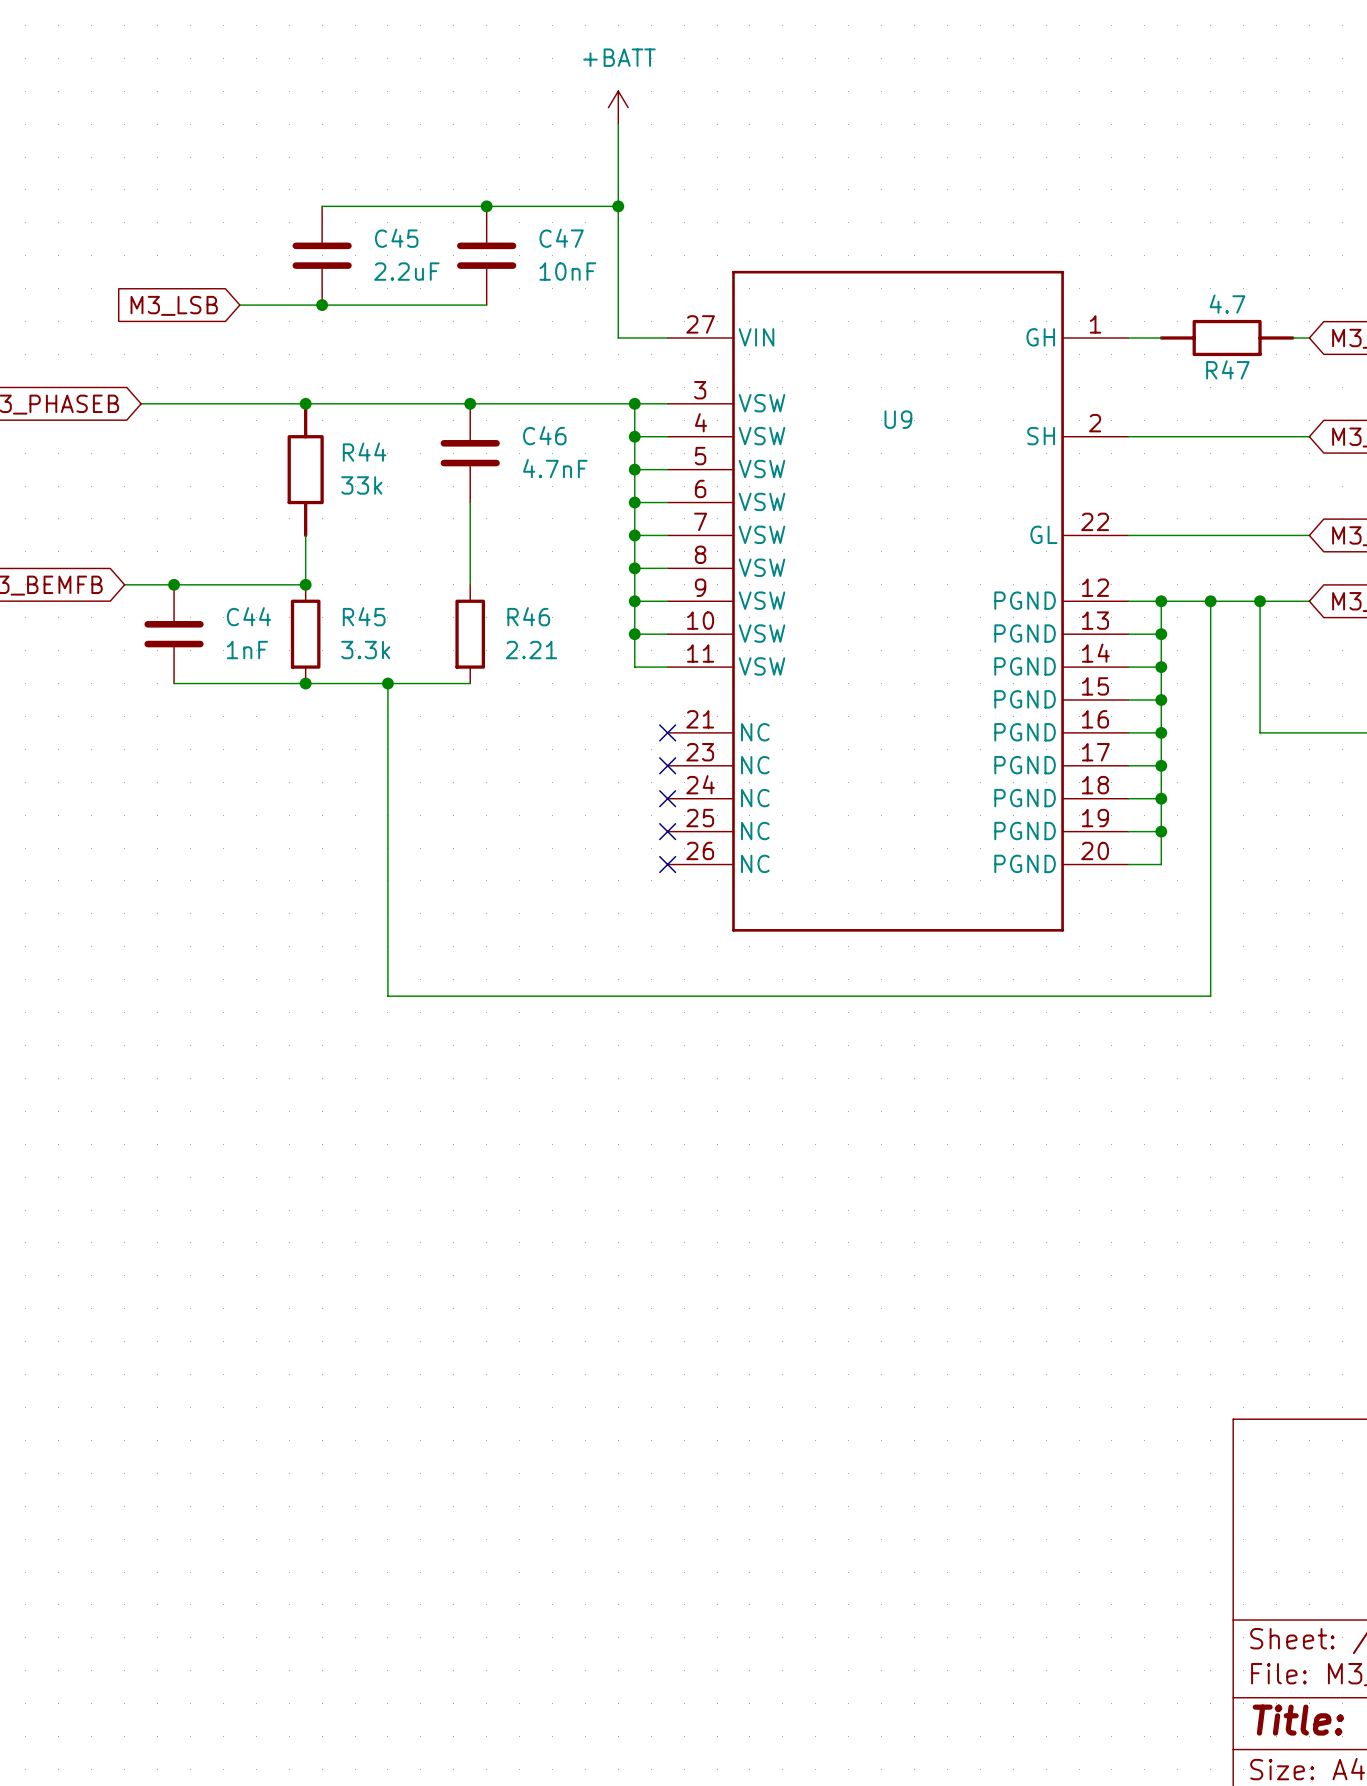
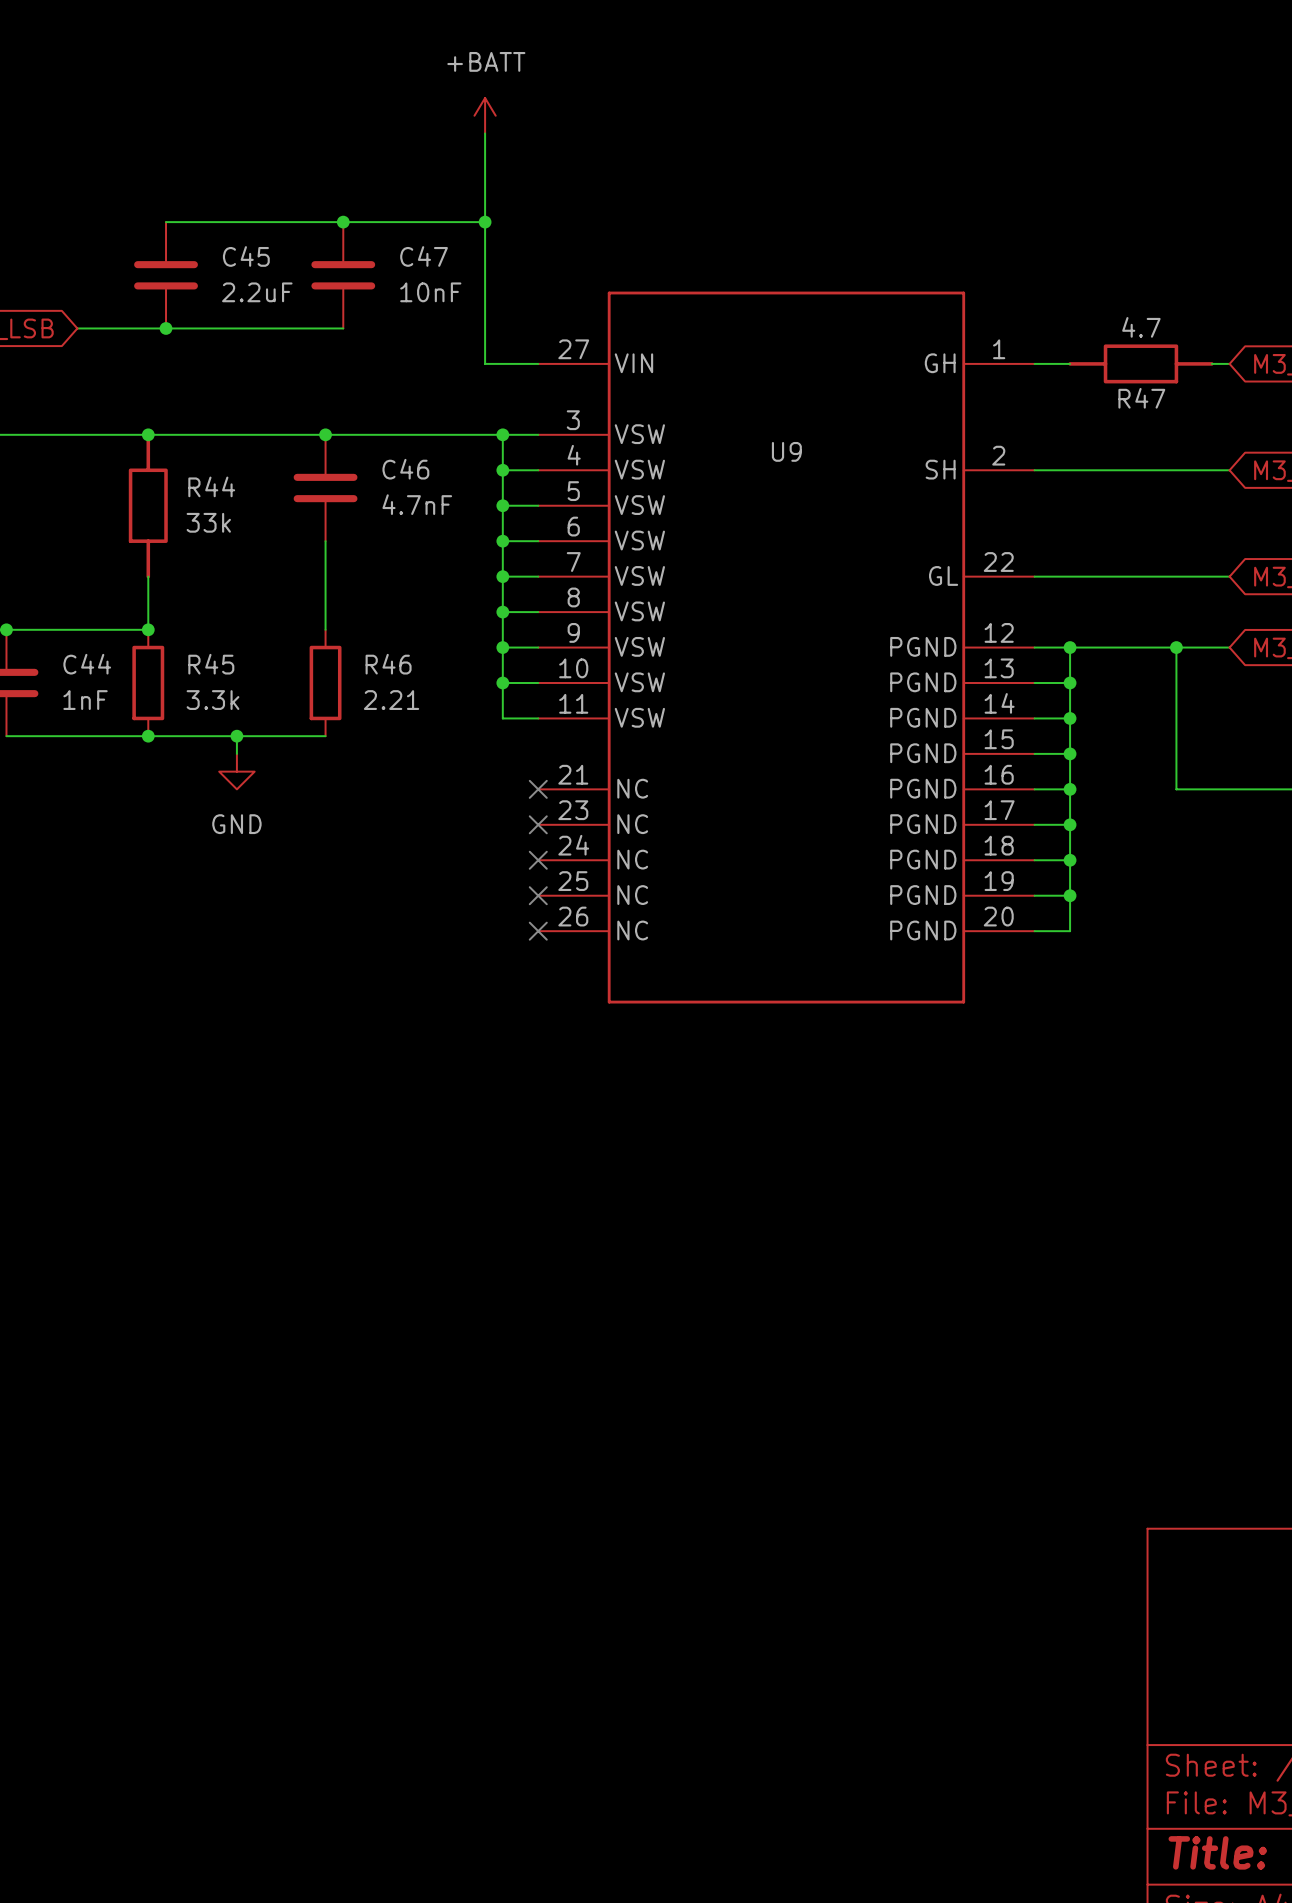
wire: (1210, 601) (1210, 996) (387, 996) (387, 699) -> none
junction: (1210, 601) -> none
power symbol: none -> GND (236, 771)

